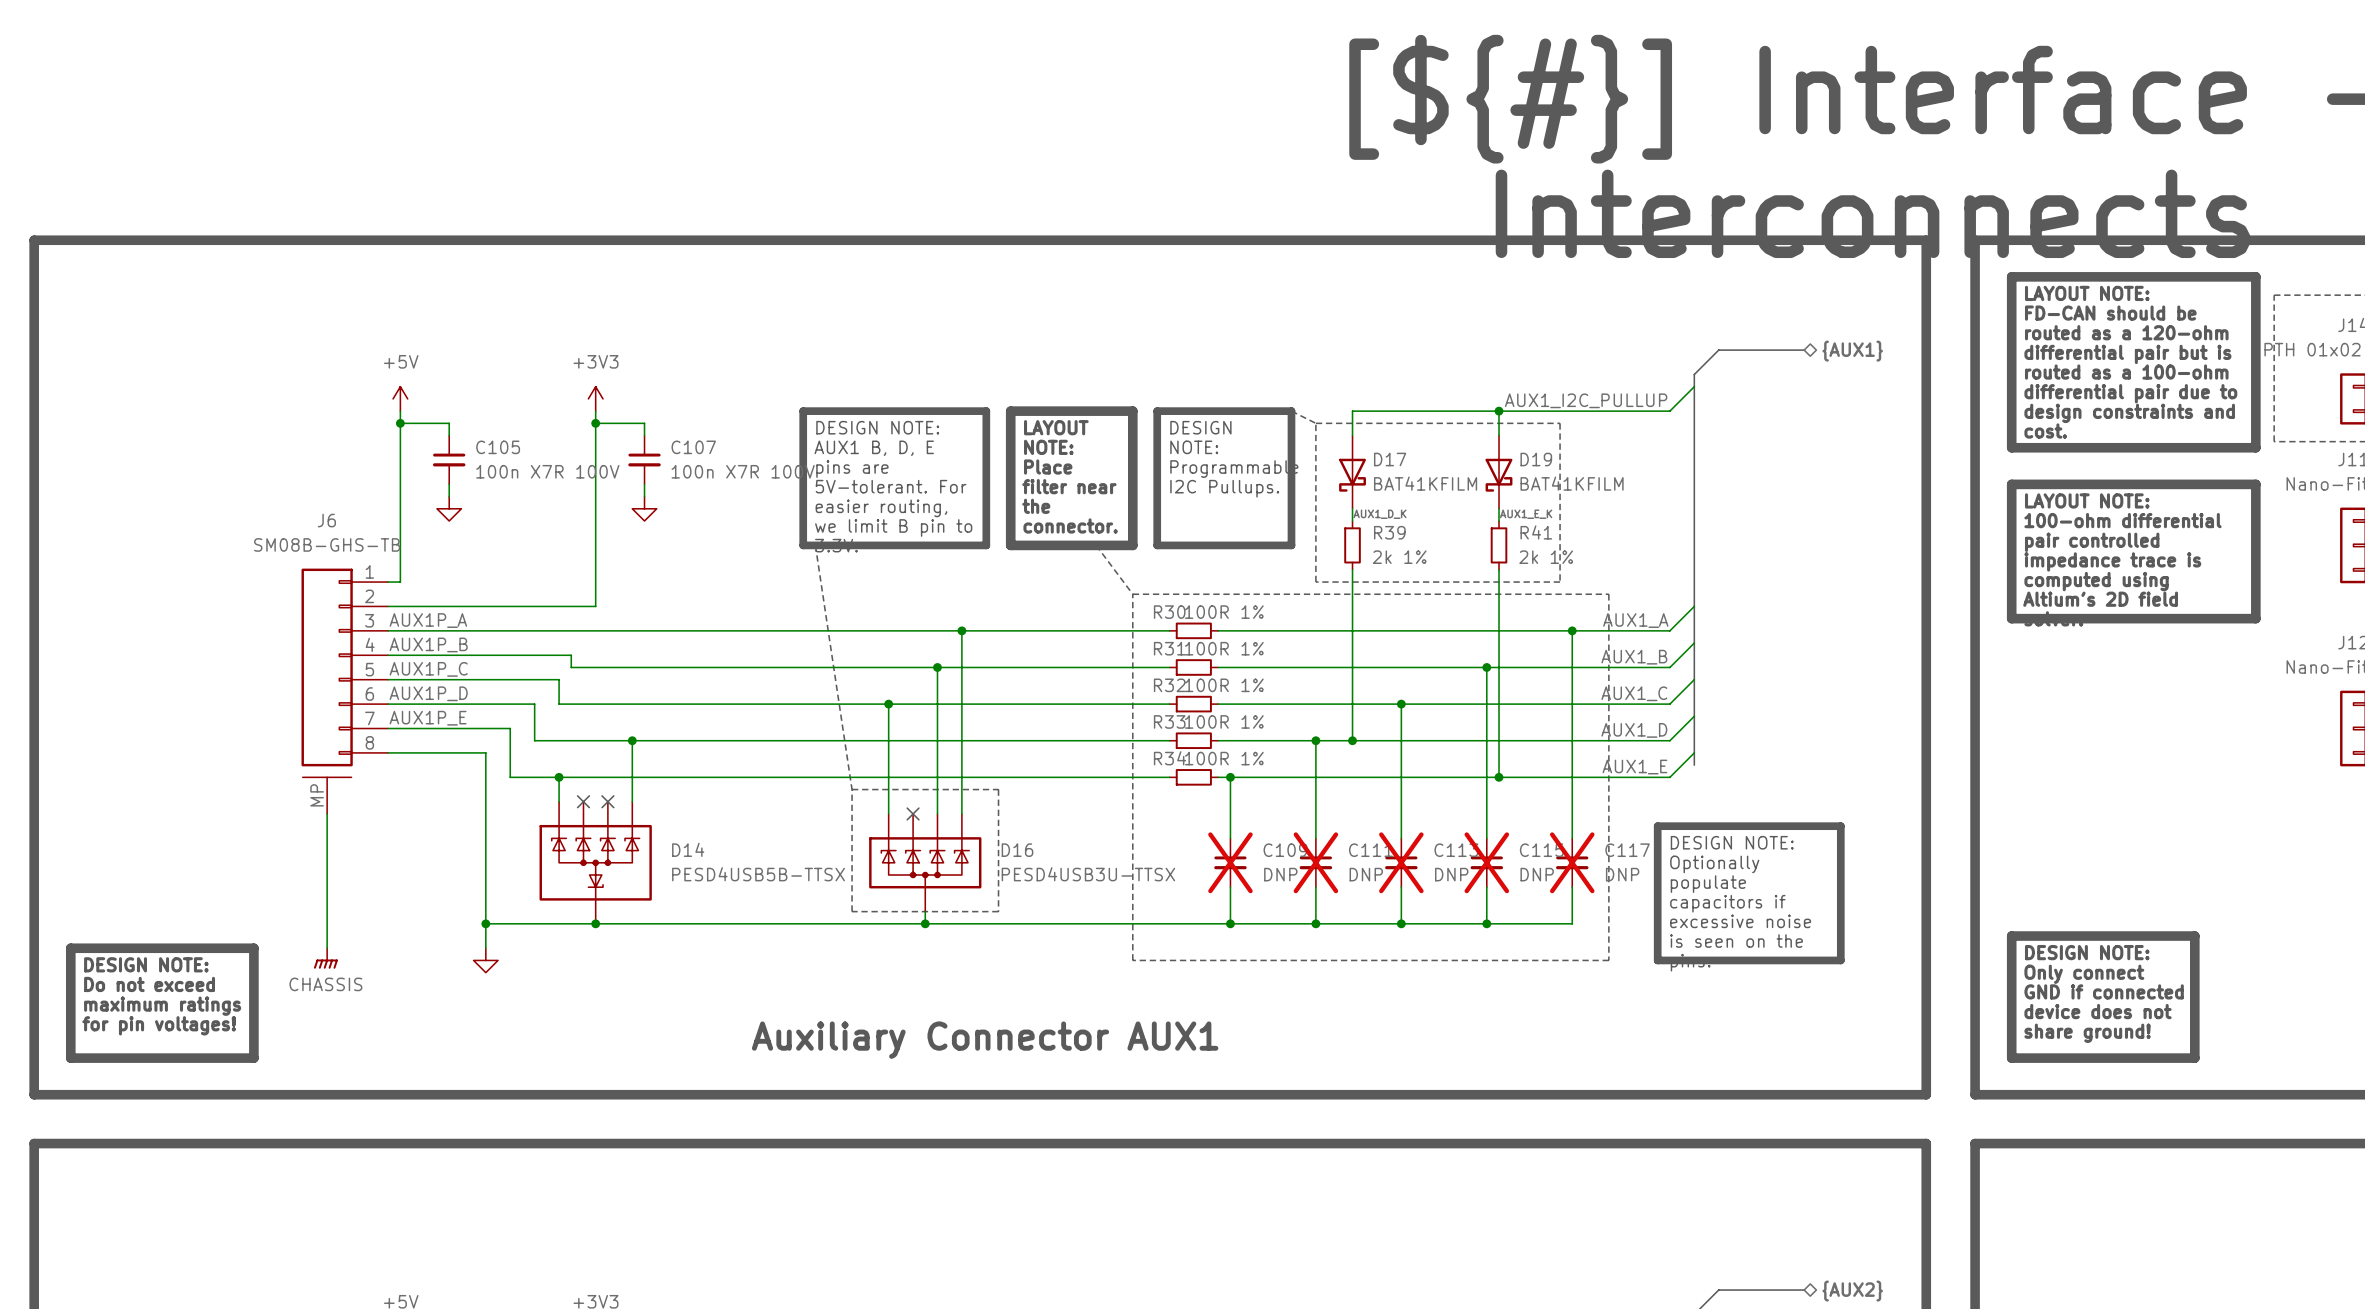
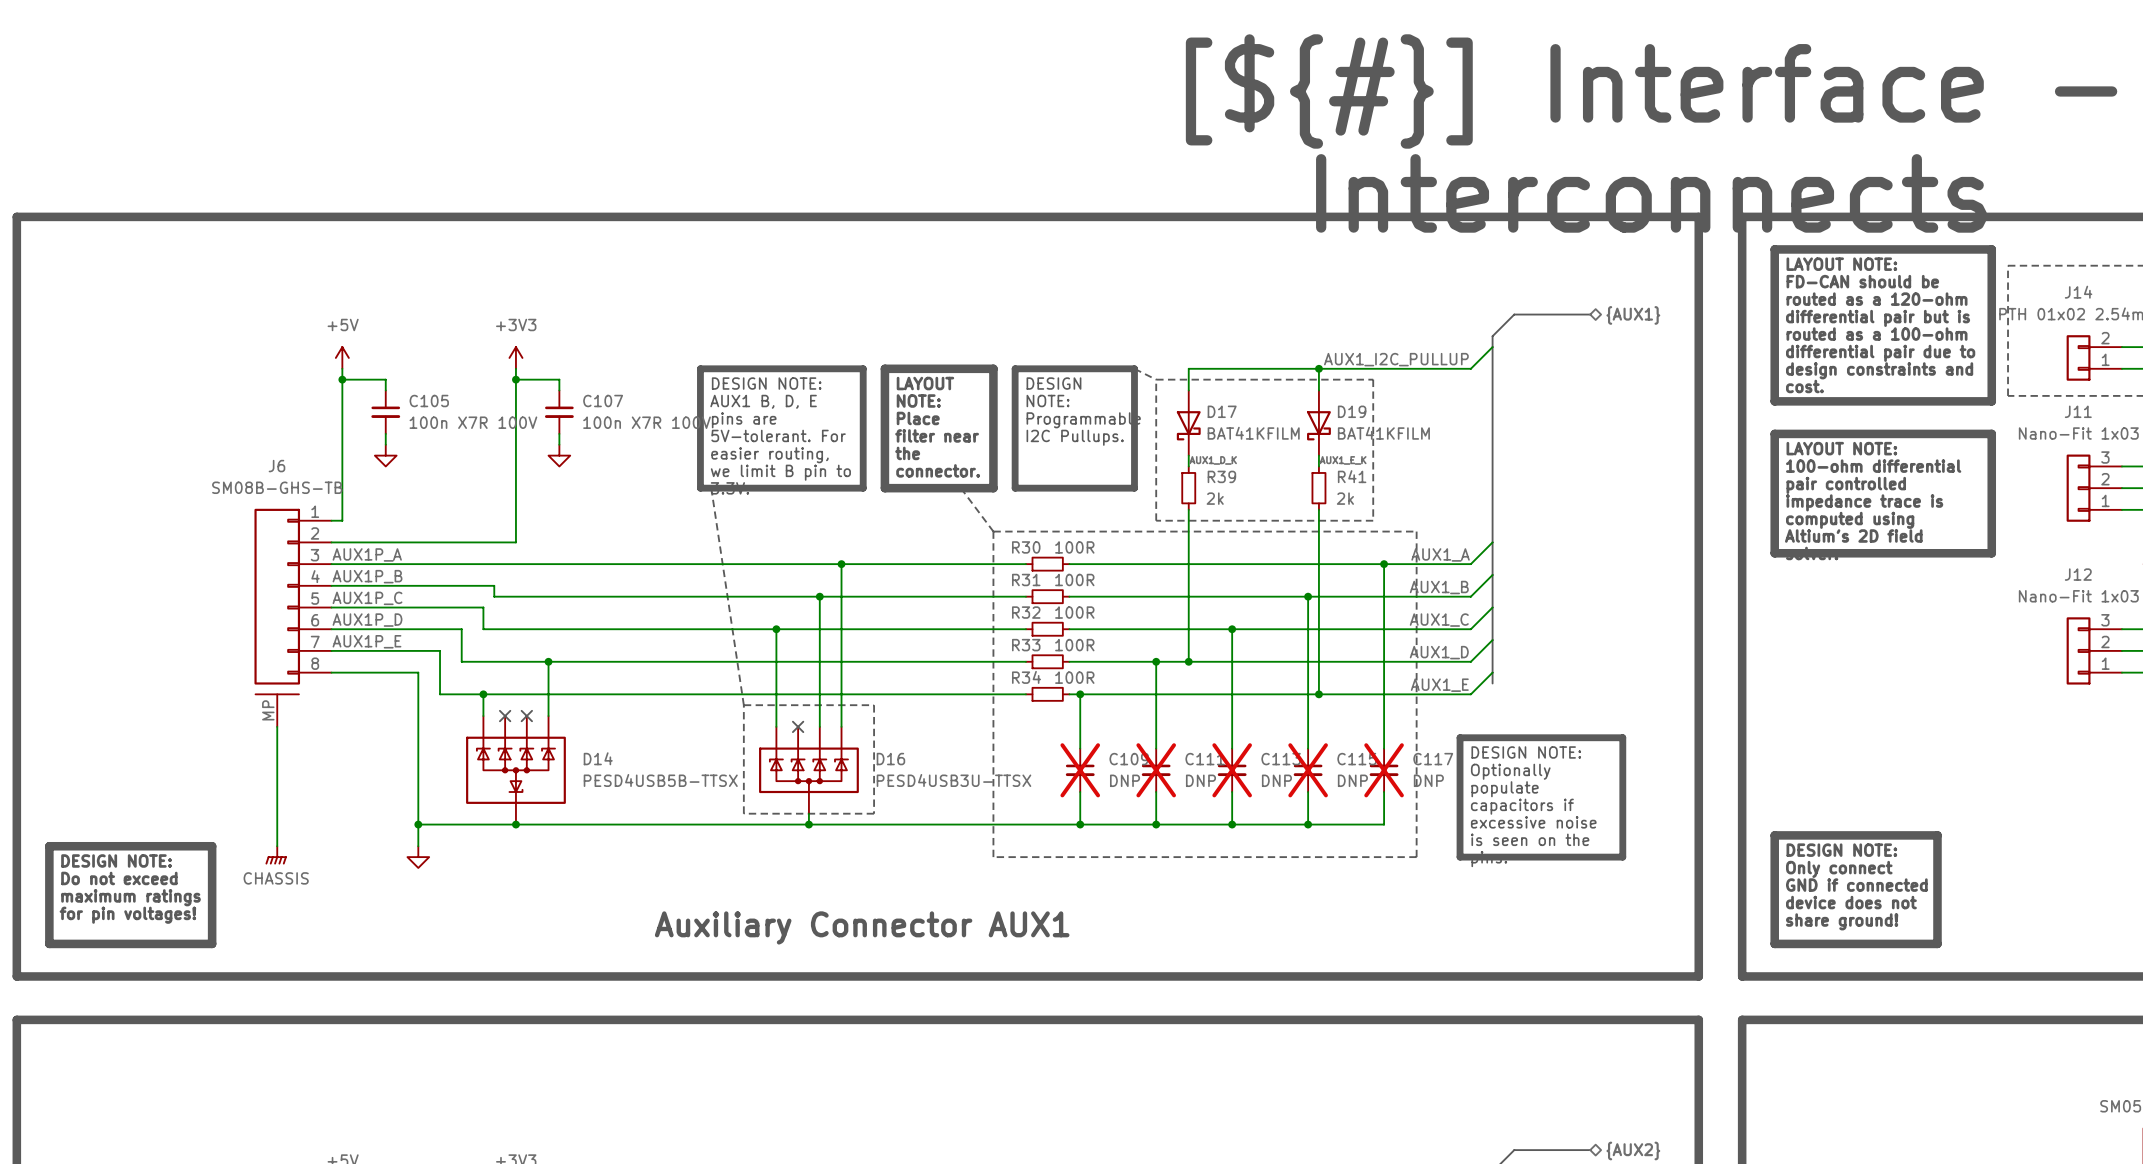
R39 value: 2k 1% (1399, 557) -> 2k (1215, 498)
R41 value: 2k 1% (1546, 557) -> 2k (1345, 498)
R30 value: 100R 1% (1224, 612) -> 100R (1074, 547)
R31 value: 100R 1% (1224, 648) -> 100R (1074, 579)
R32 value: 100R 1% (1224, 685) -> 100R (1074, 612)
R33 value: 100R 1% (1224, 721) -> 100R (1074, 645)
R34 value: 100R 1% (1224, 758) -> 100R (1074, 677)

